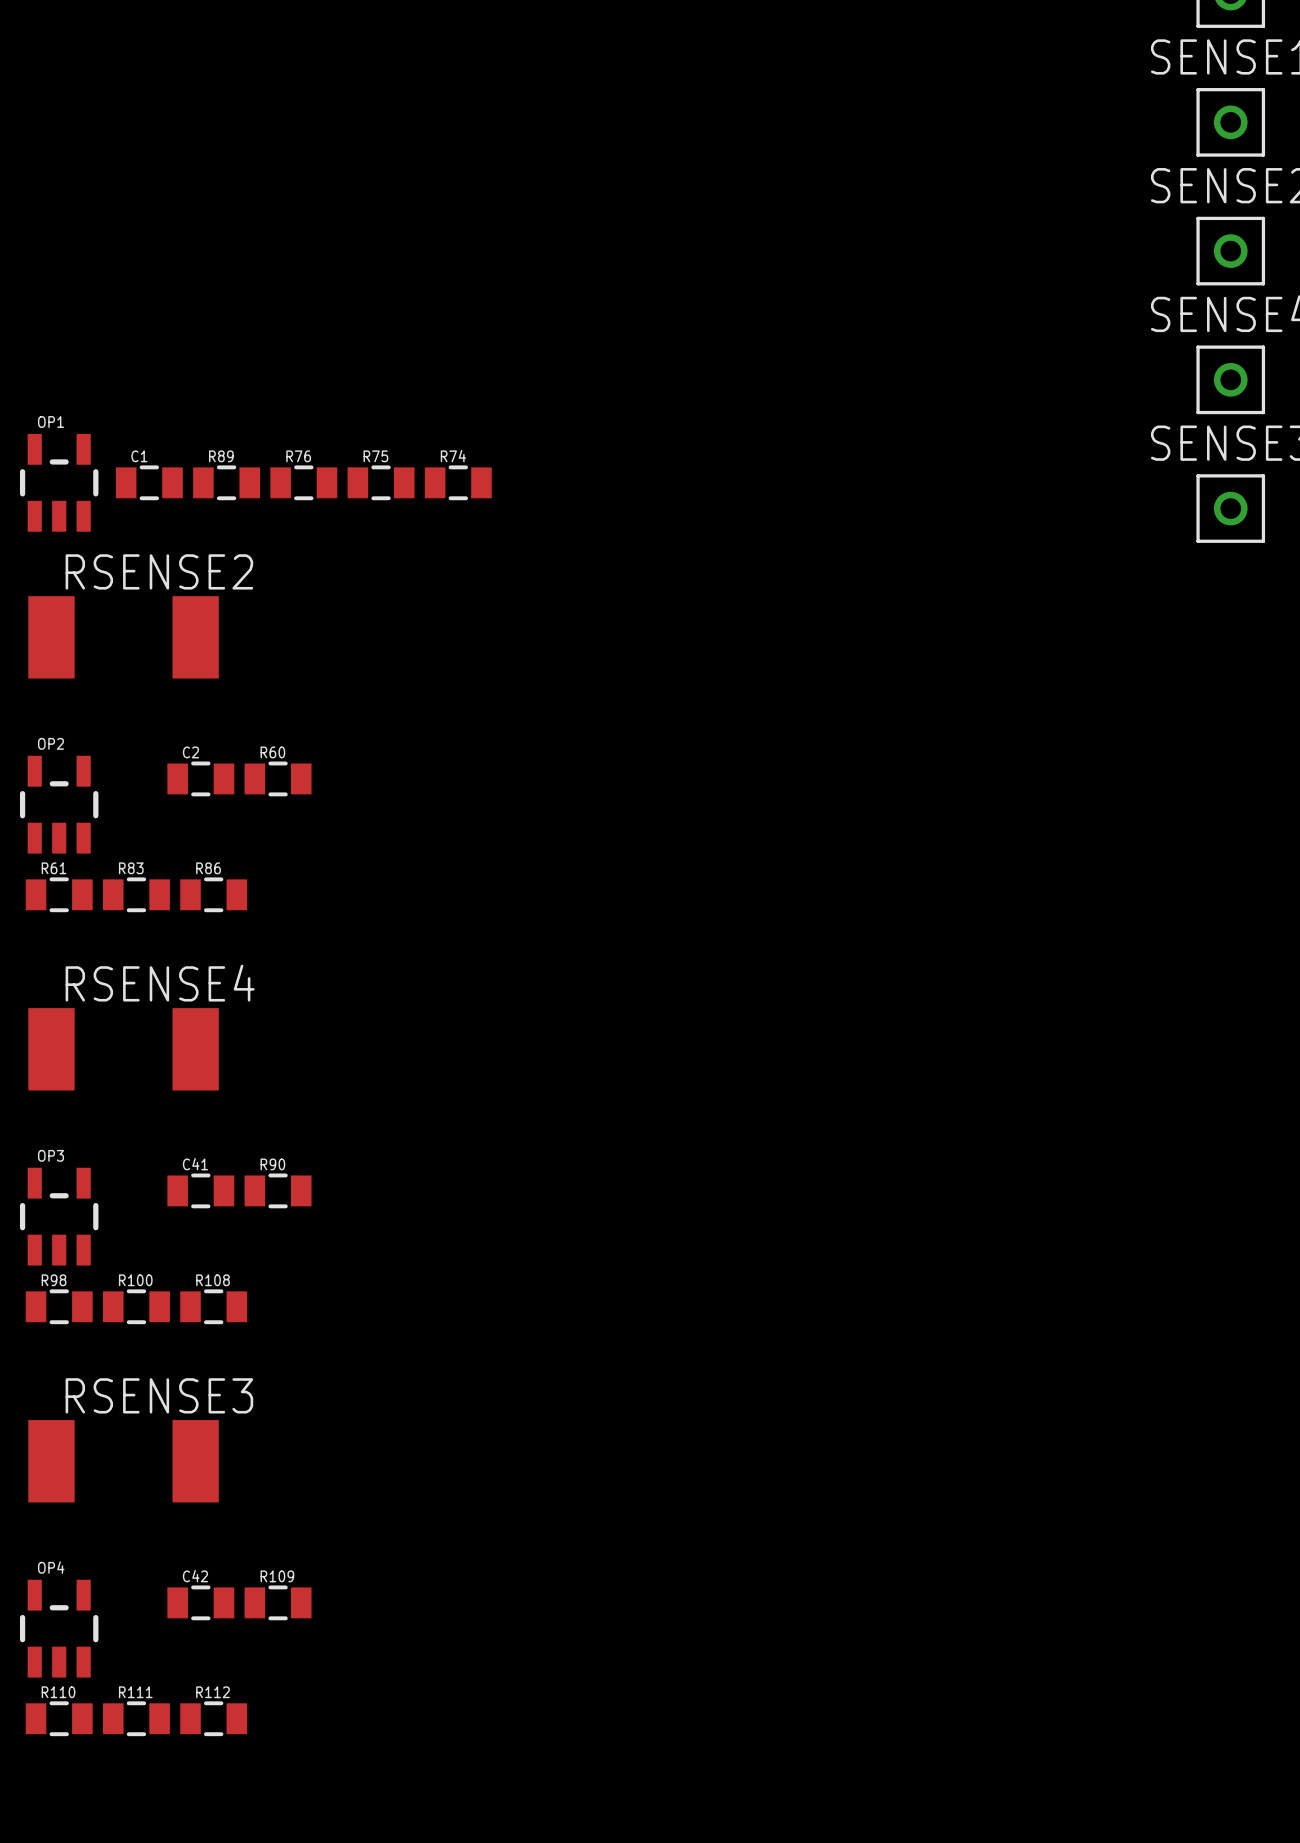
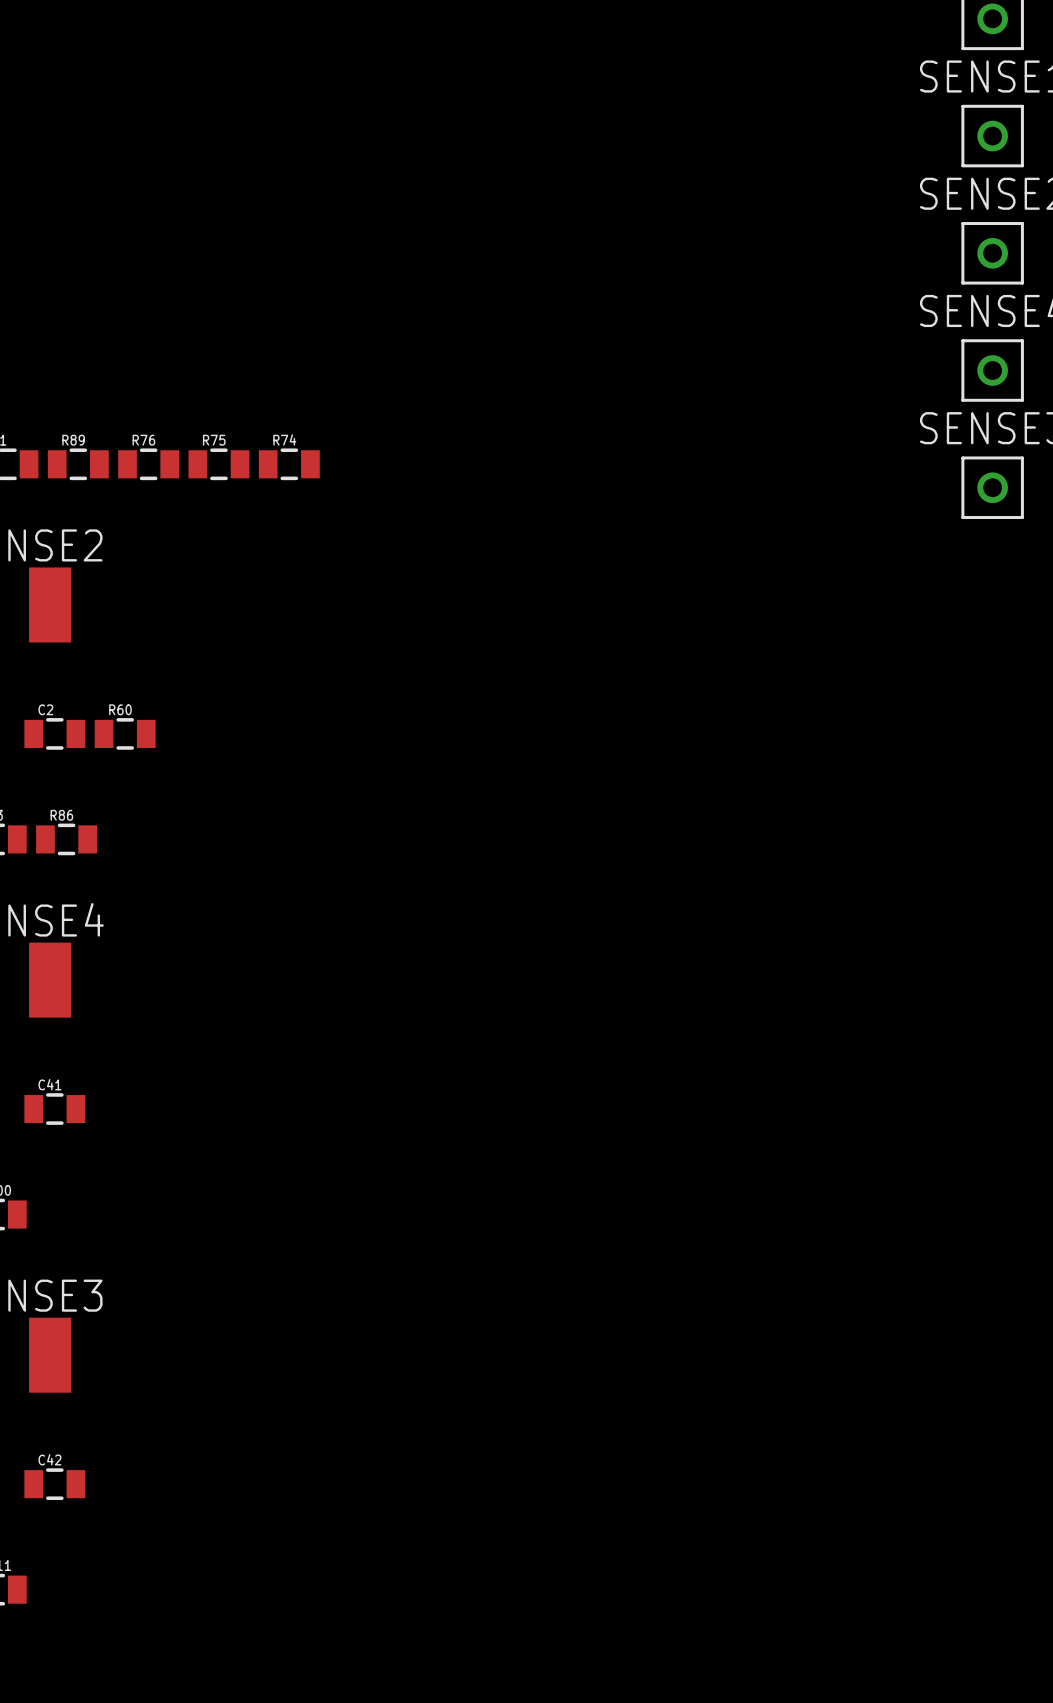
R90: (278, 1190) -> none
R108: (213, 1306) -> none
R109: (278, 1602) -> none
R112: (213, 1718) -> none

